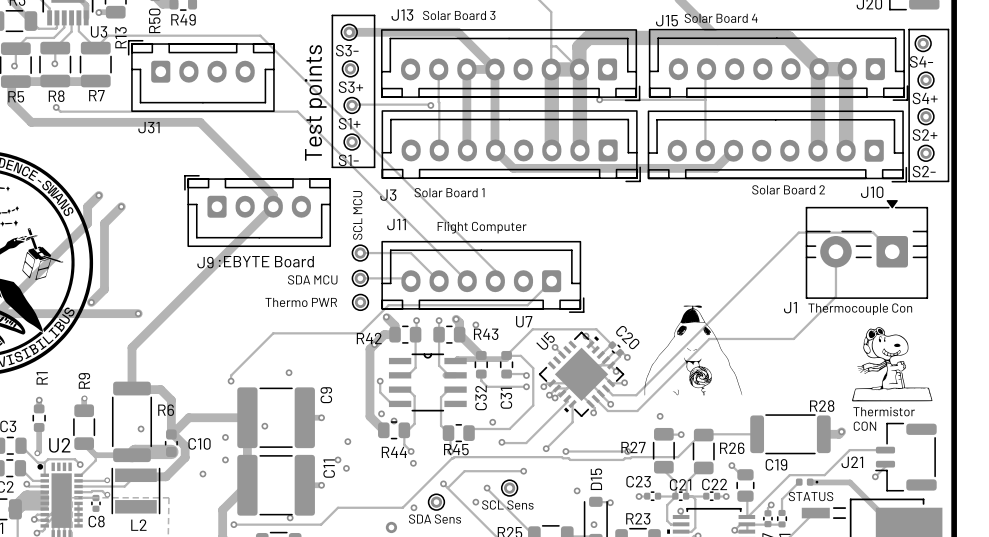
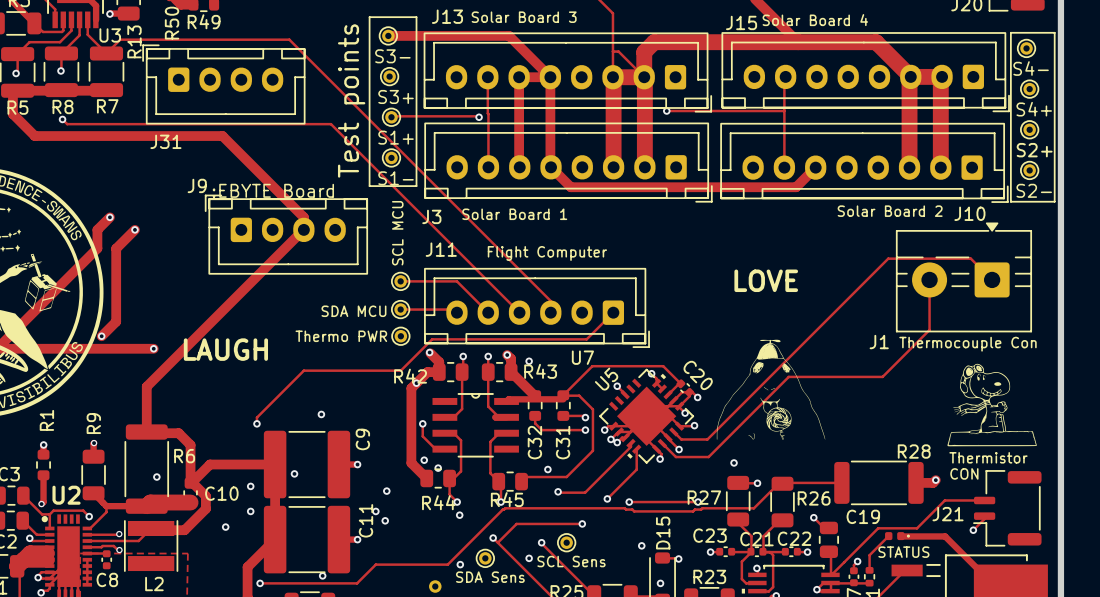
text: none -> LOVE (766, 280)
text position: :EBYTE Board (266, 261) -> :EBYTE Board (273, 190)
J9 name position: J9 (205, 262) -> J9 (197, 185)
text: none -> LAUGH (225, 349)

